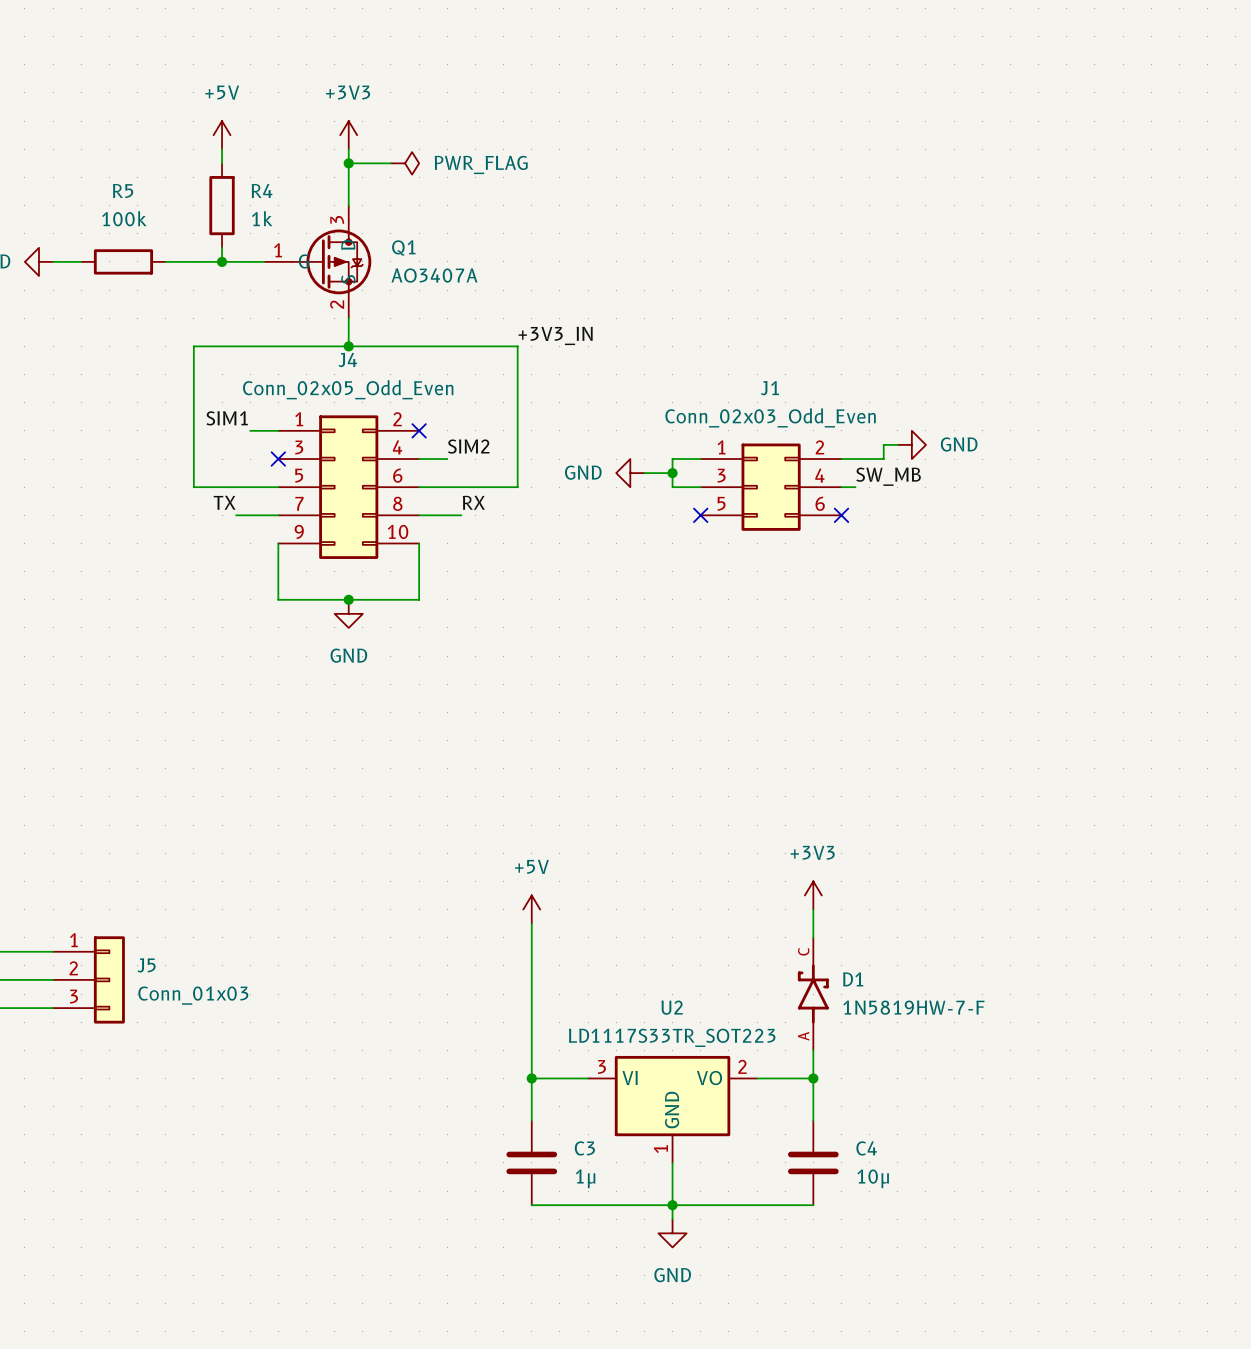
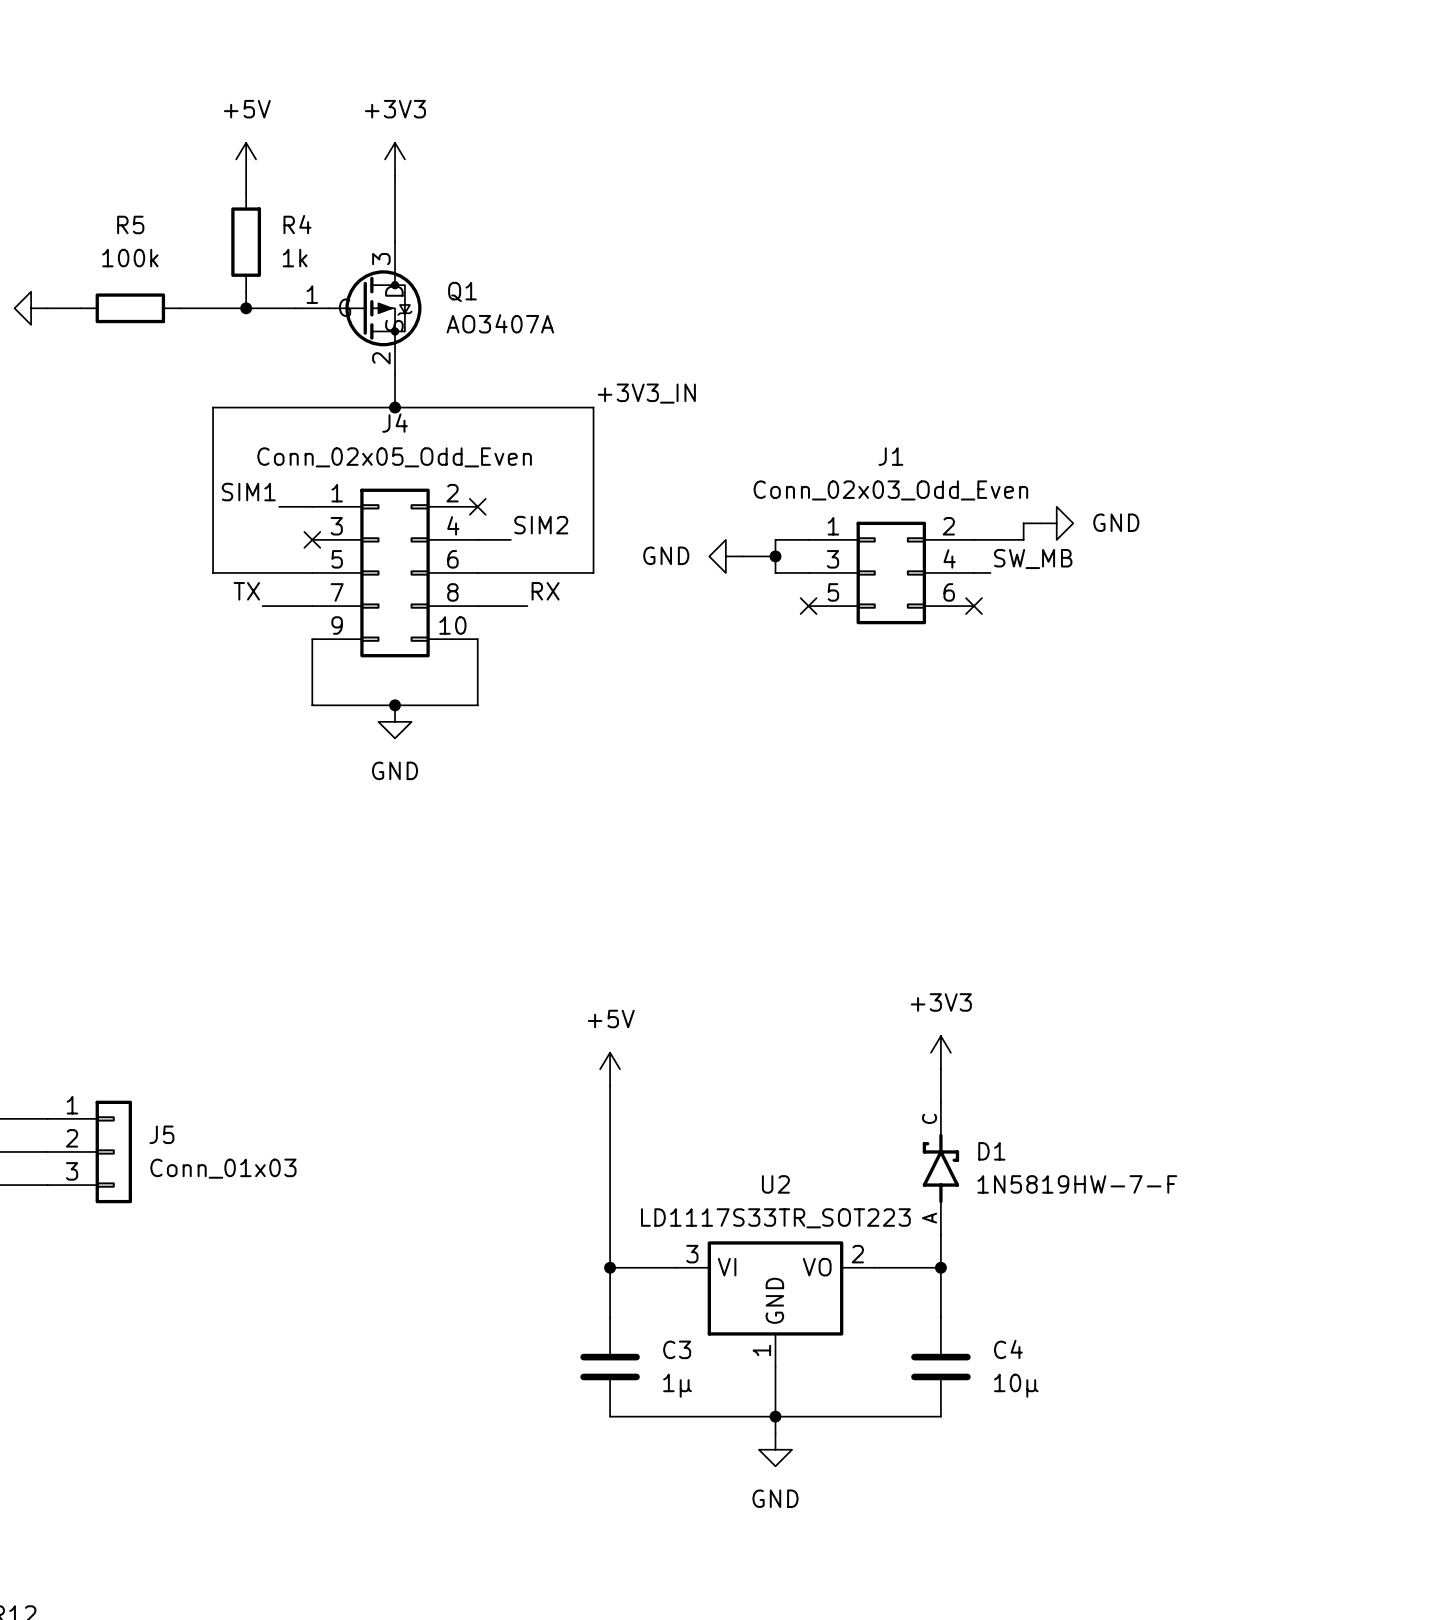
wire: (348, 163) (390, 163) -> none
junction: (348, 163) -> none
power symbol: PWR_FLAG (405, 163) -> none

